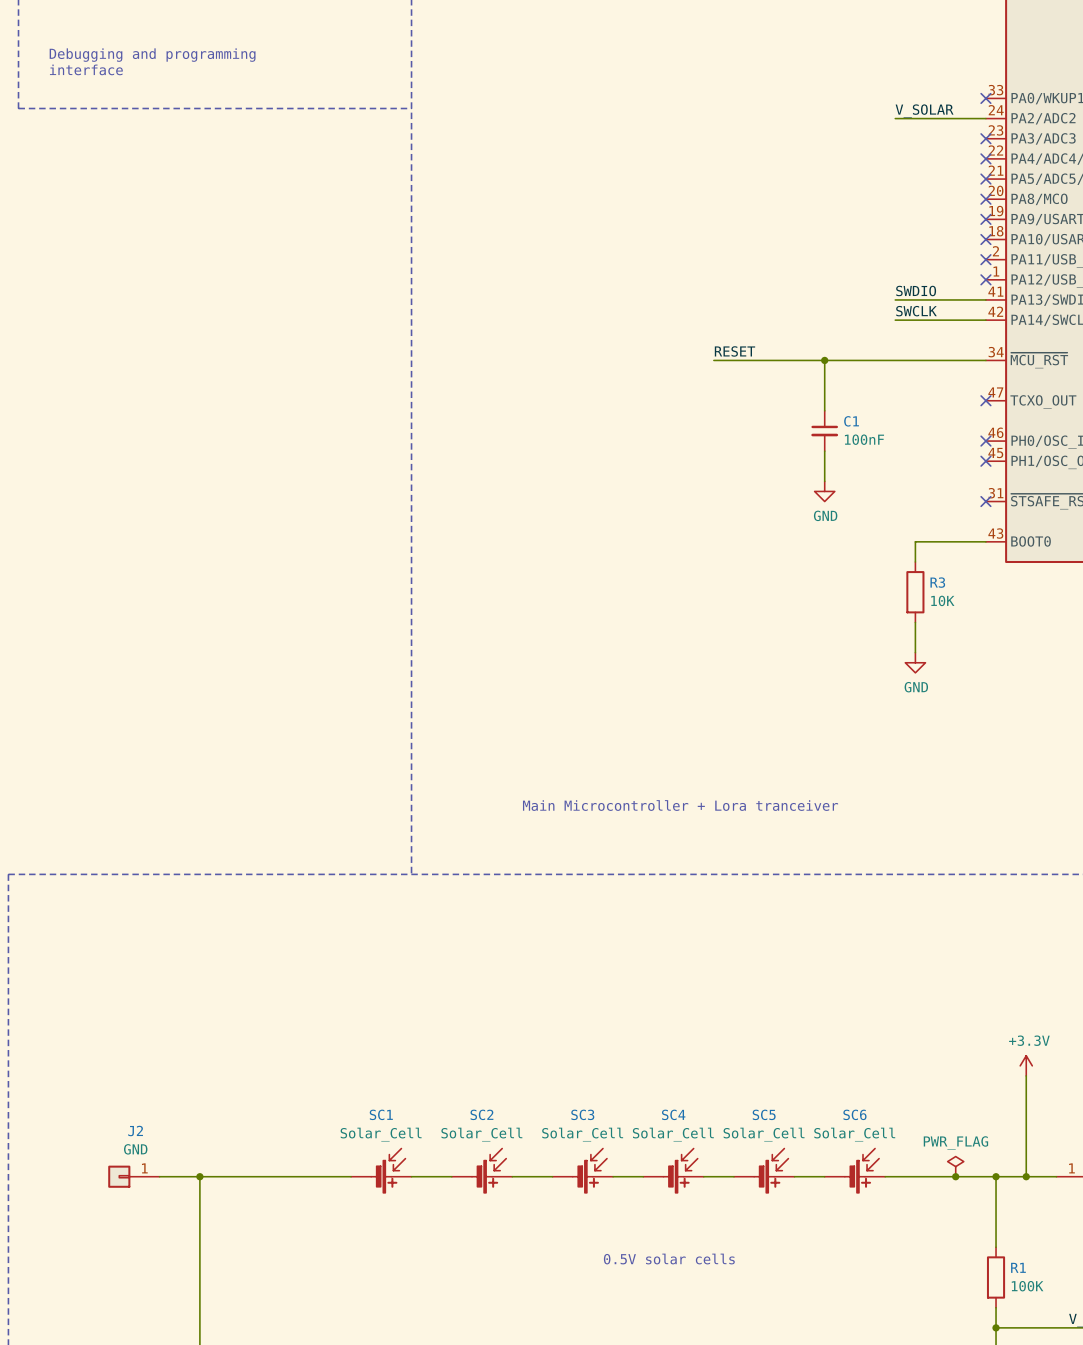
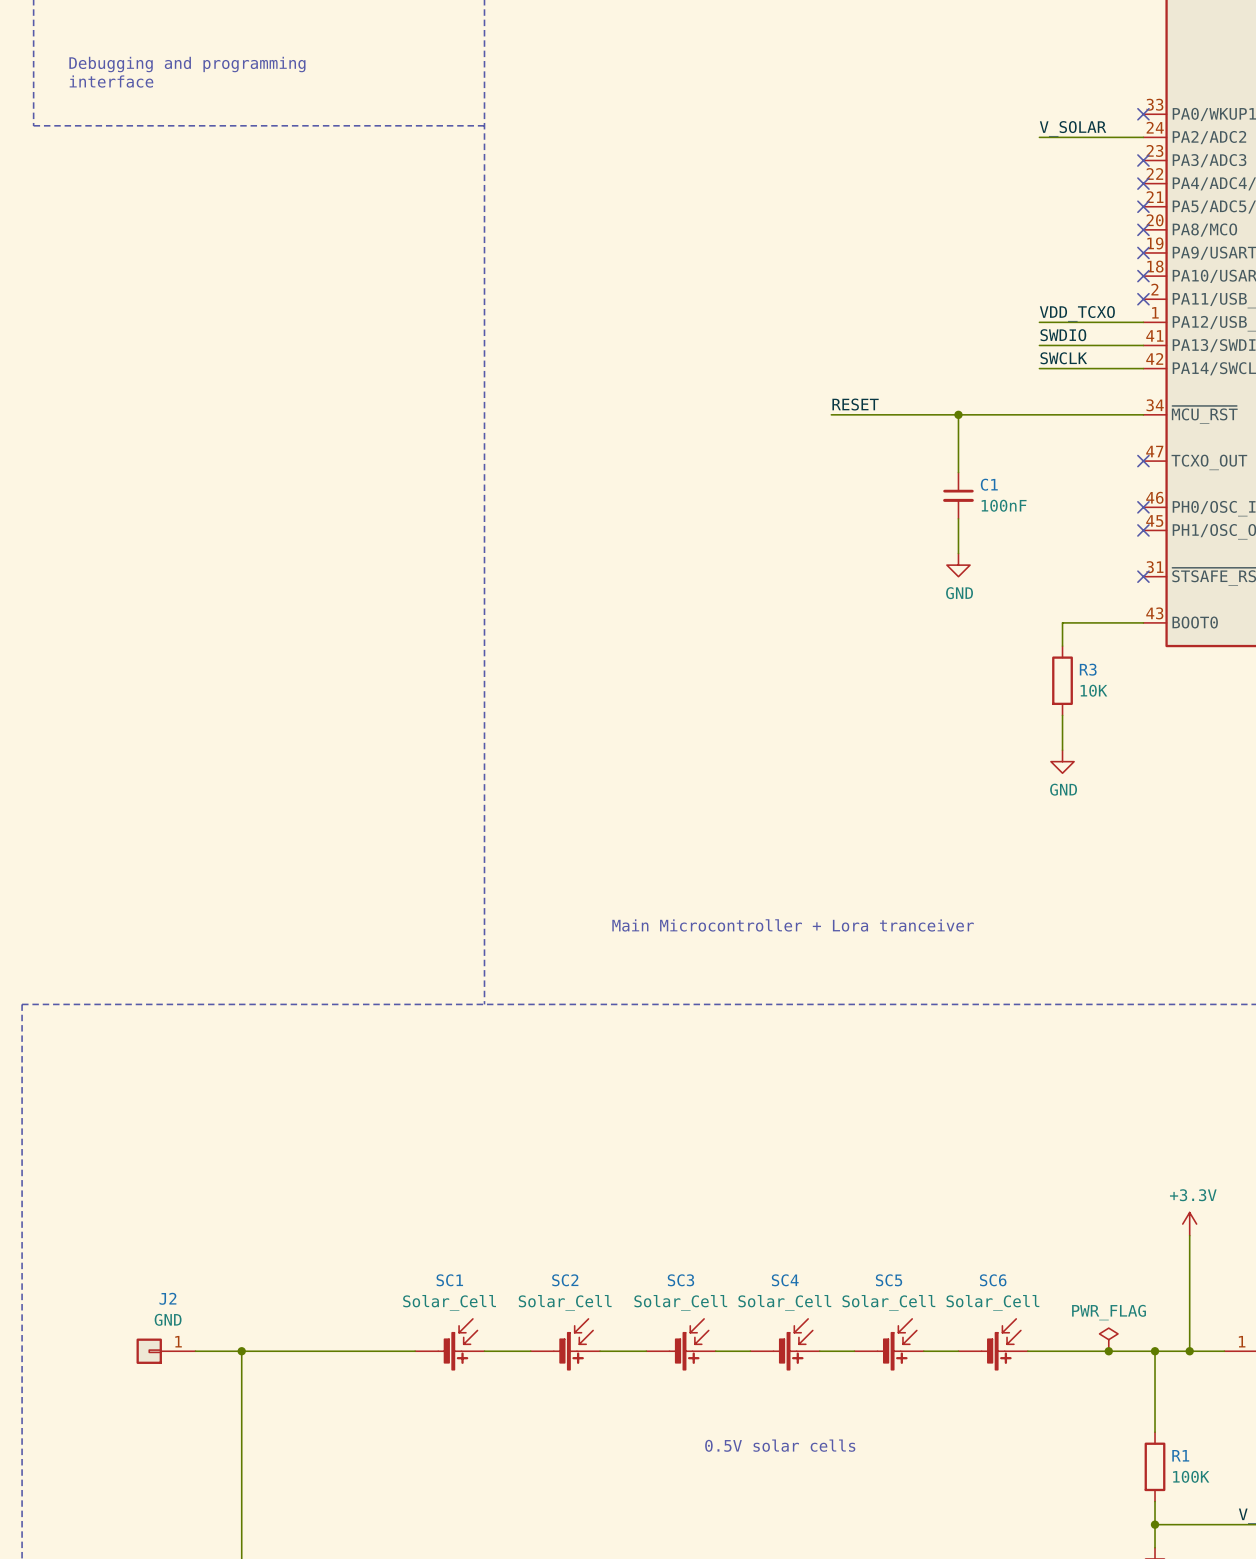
label: none -> VDD_TCXO (1077, 313)
wire: none -> (1039, 322) (1143, 322)
no-connect mark: (985, 279) -> none

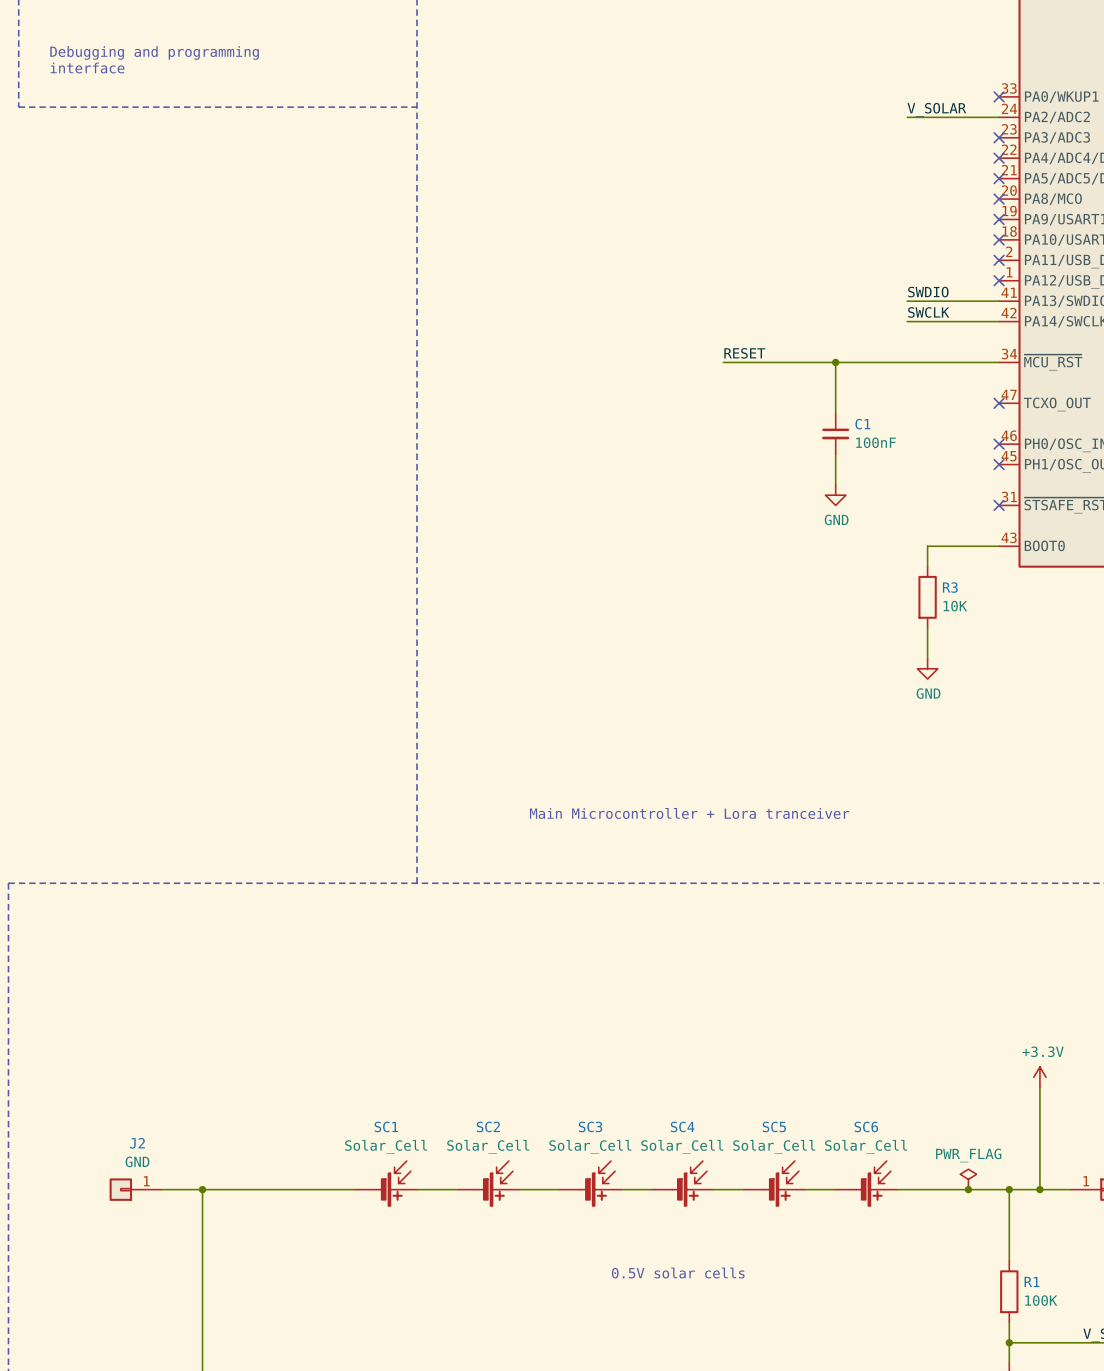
label: VDD_TCXO (1077, 313) -> none
wire: (1039, 322) (1143, 322) -> none
no-connect mark: none -> (999, 280)

